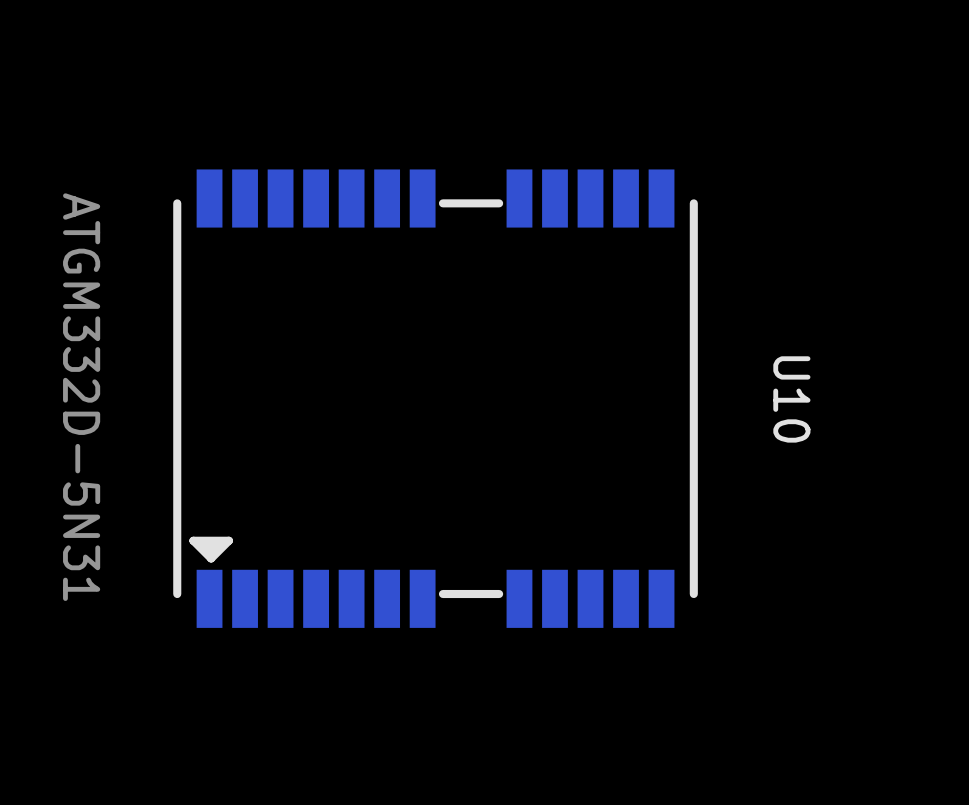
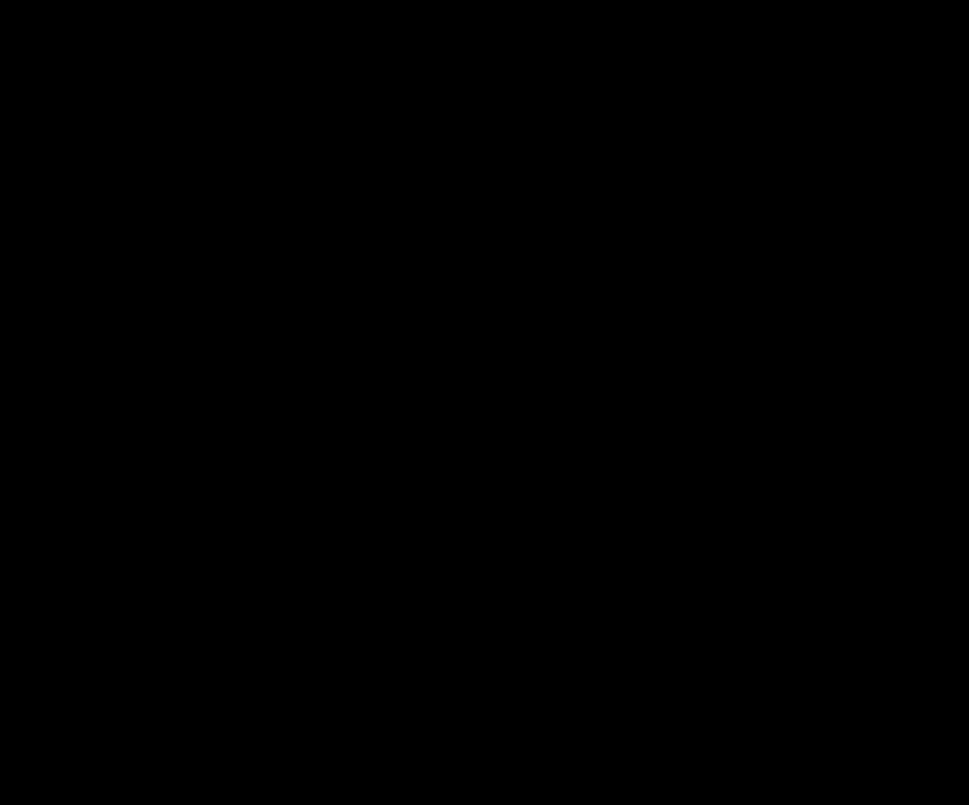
U10: ATGM332D-5N31 (435, 398) -> none

